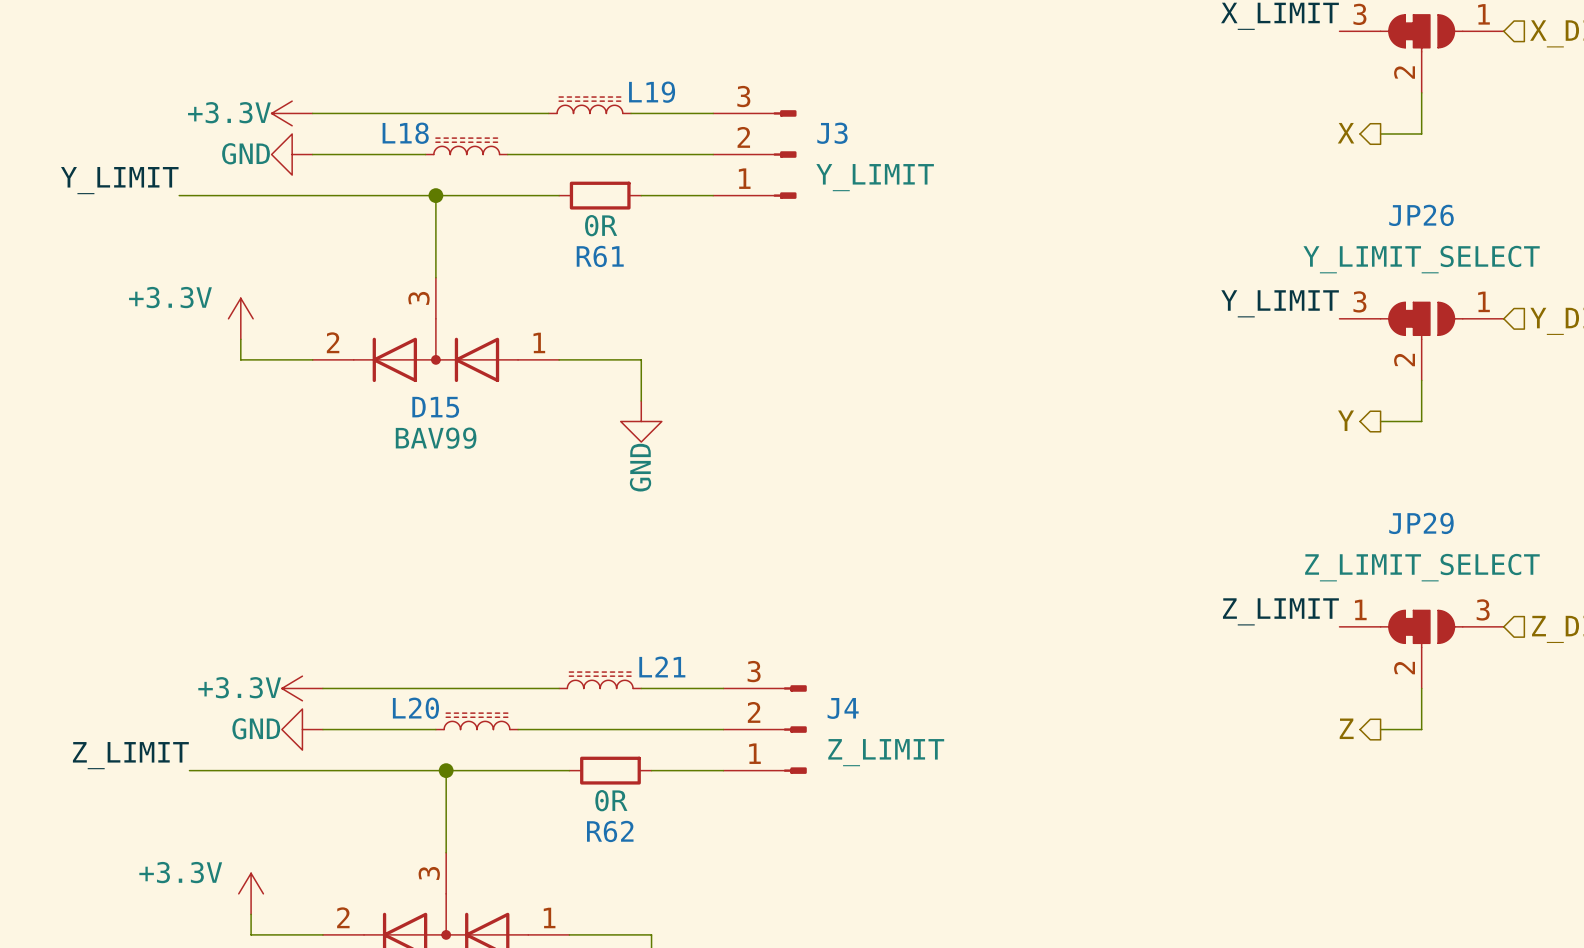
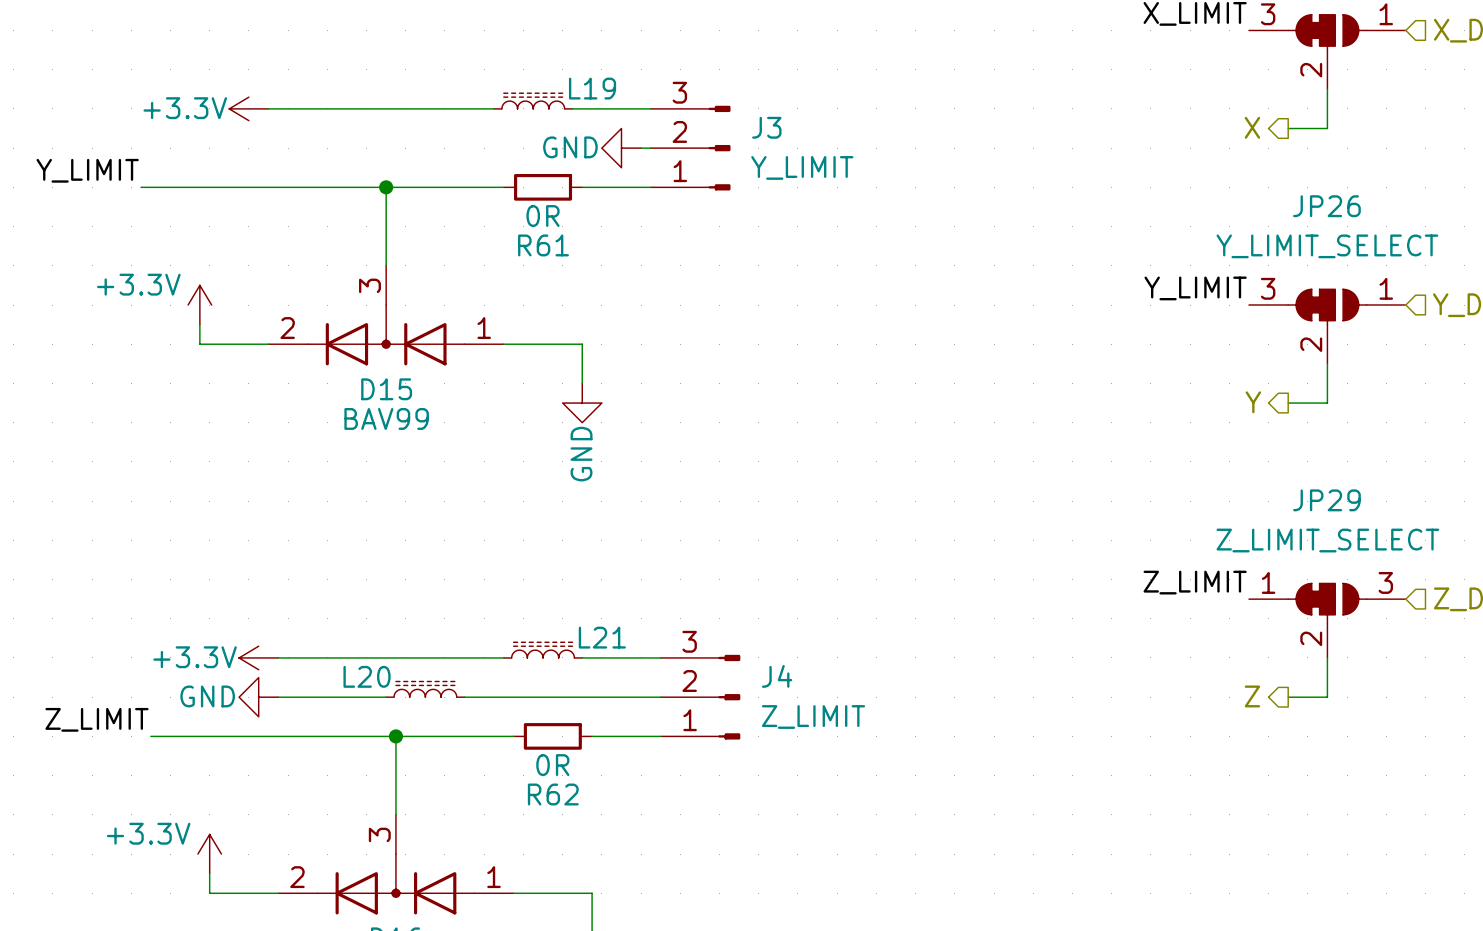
L18: (466, 146) -> none
power symbol position: GND (292, 154) -> GND (621, 148)
wire: (312, 154) (425, 154) -> none
wire: (507, 154) (702, 154) -> none

